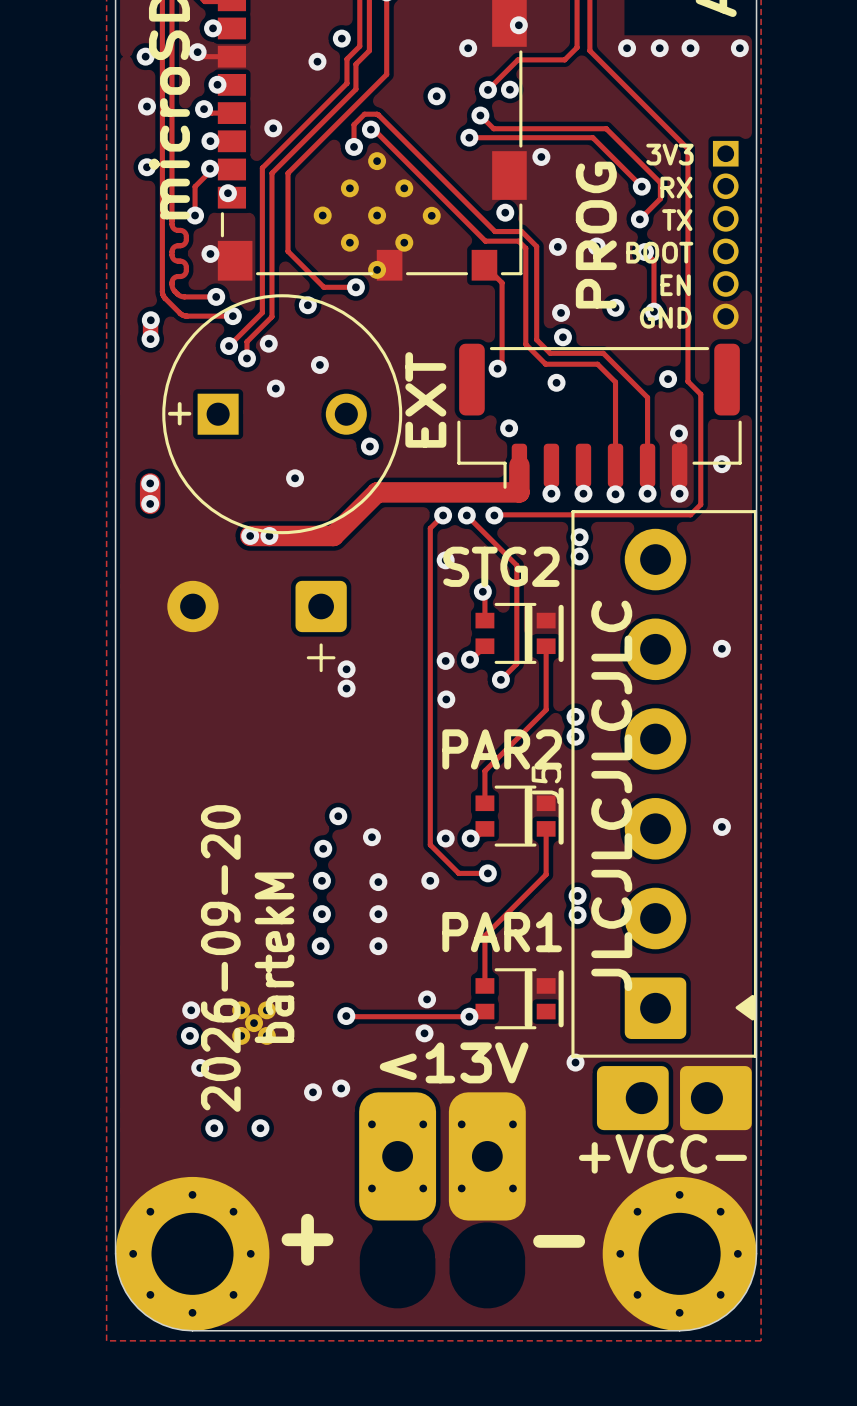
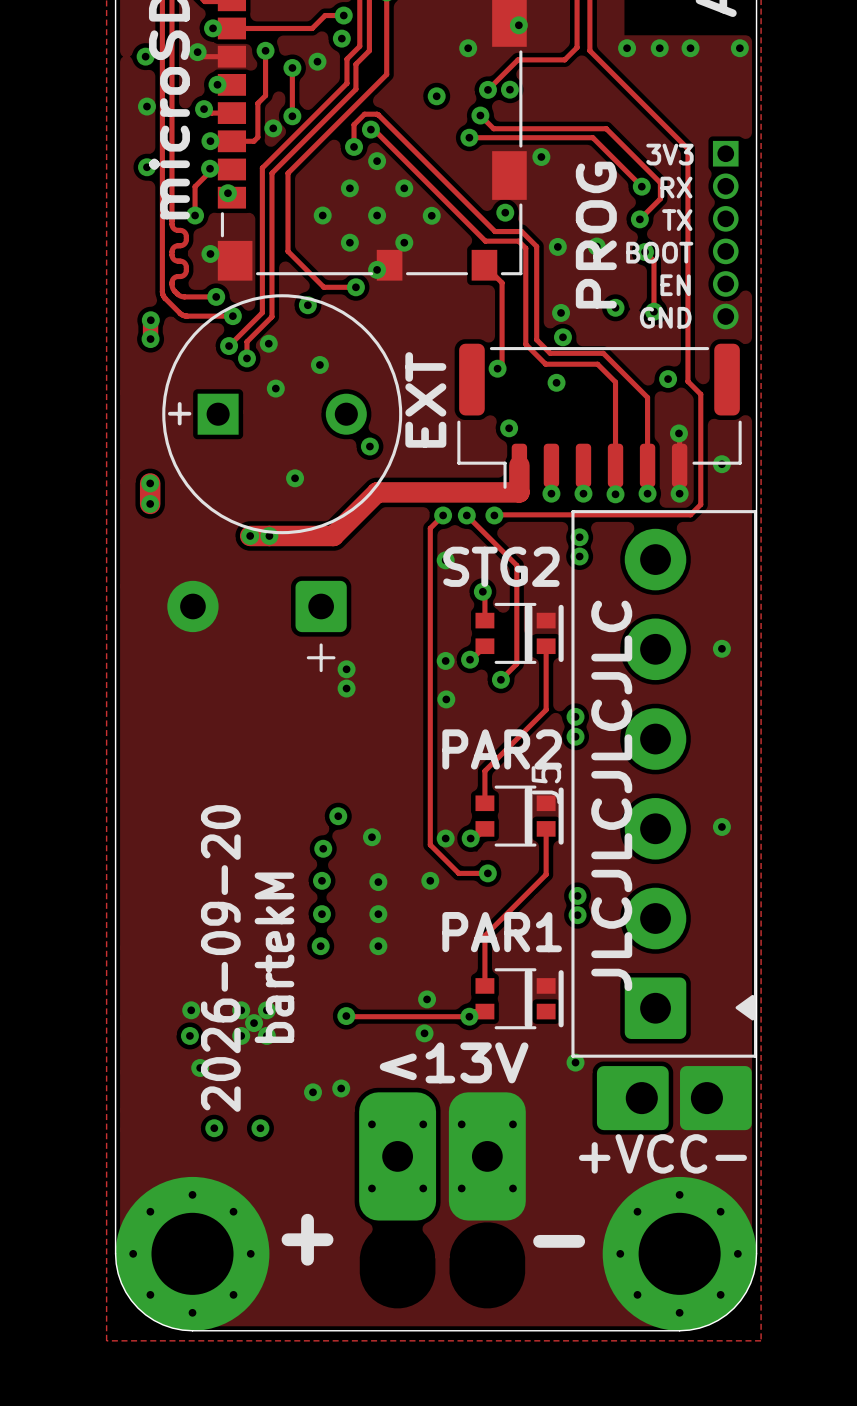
track: none -> (343, 15) (325, 15) (312, 28) (231, 28)
via: none -> (343, 15)
track: none -> (265, 50) (265, 95) (257, 103) (257, 137) (253, 141) (231, 141)
via: none -> (265, 50)
via: none -> (292, 67)
track: none -> (292, 68) (292, 116)
via: none -> (292, 116)

